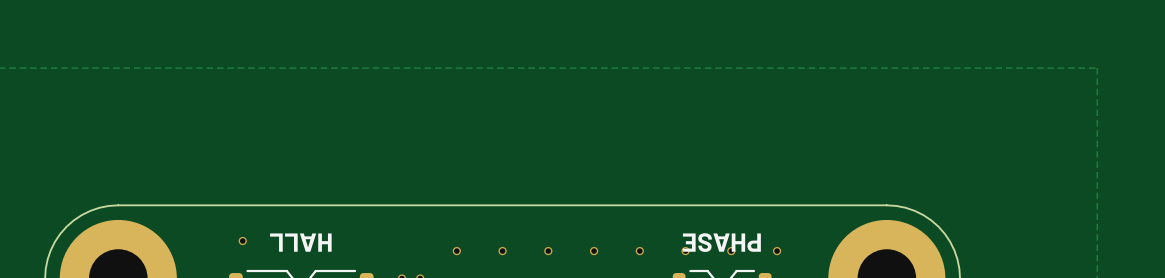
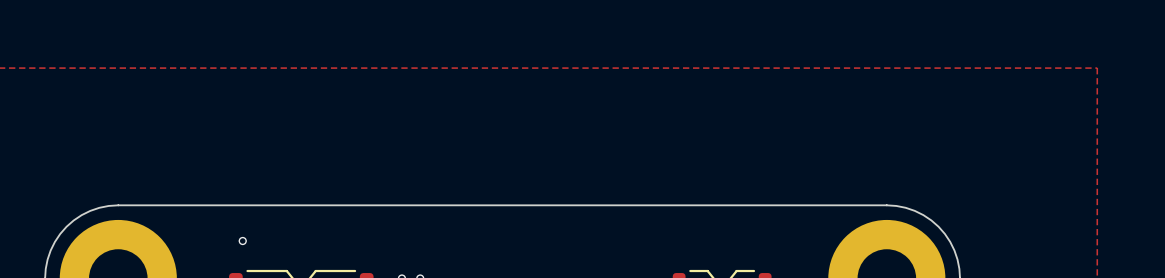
text: HALL (300, 242) -> none
text: PHASE (721, 242) -> none
via: (456, 251) -> none
via: (502, 251) -> none
via: (548, 251) -> none
via: (594, 251) -> none
via: (639, 251) -> none
via: (685, 251) -> none
via: (731, 251) -> none
via: (777, 251) -> none

